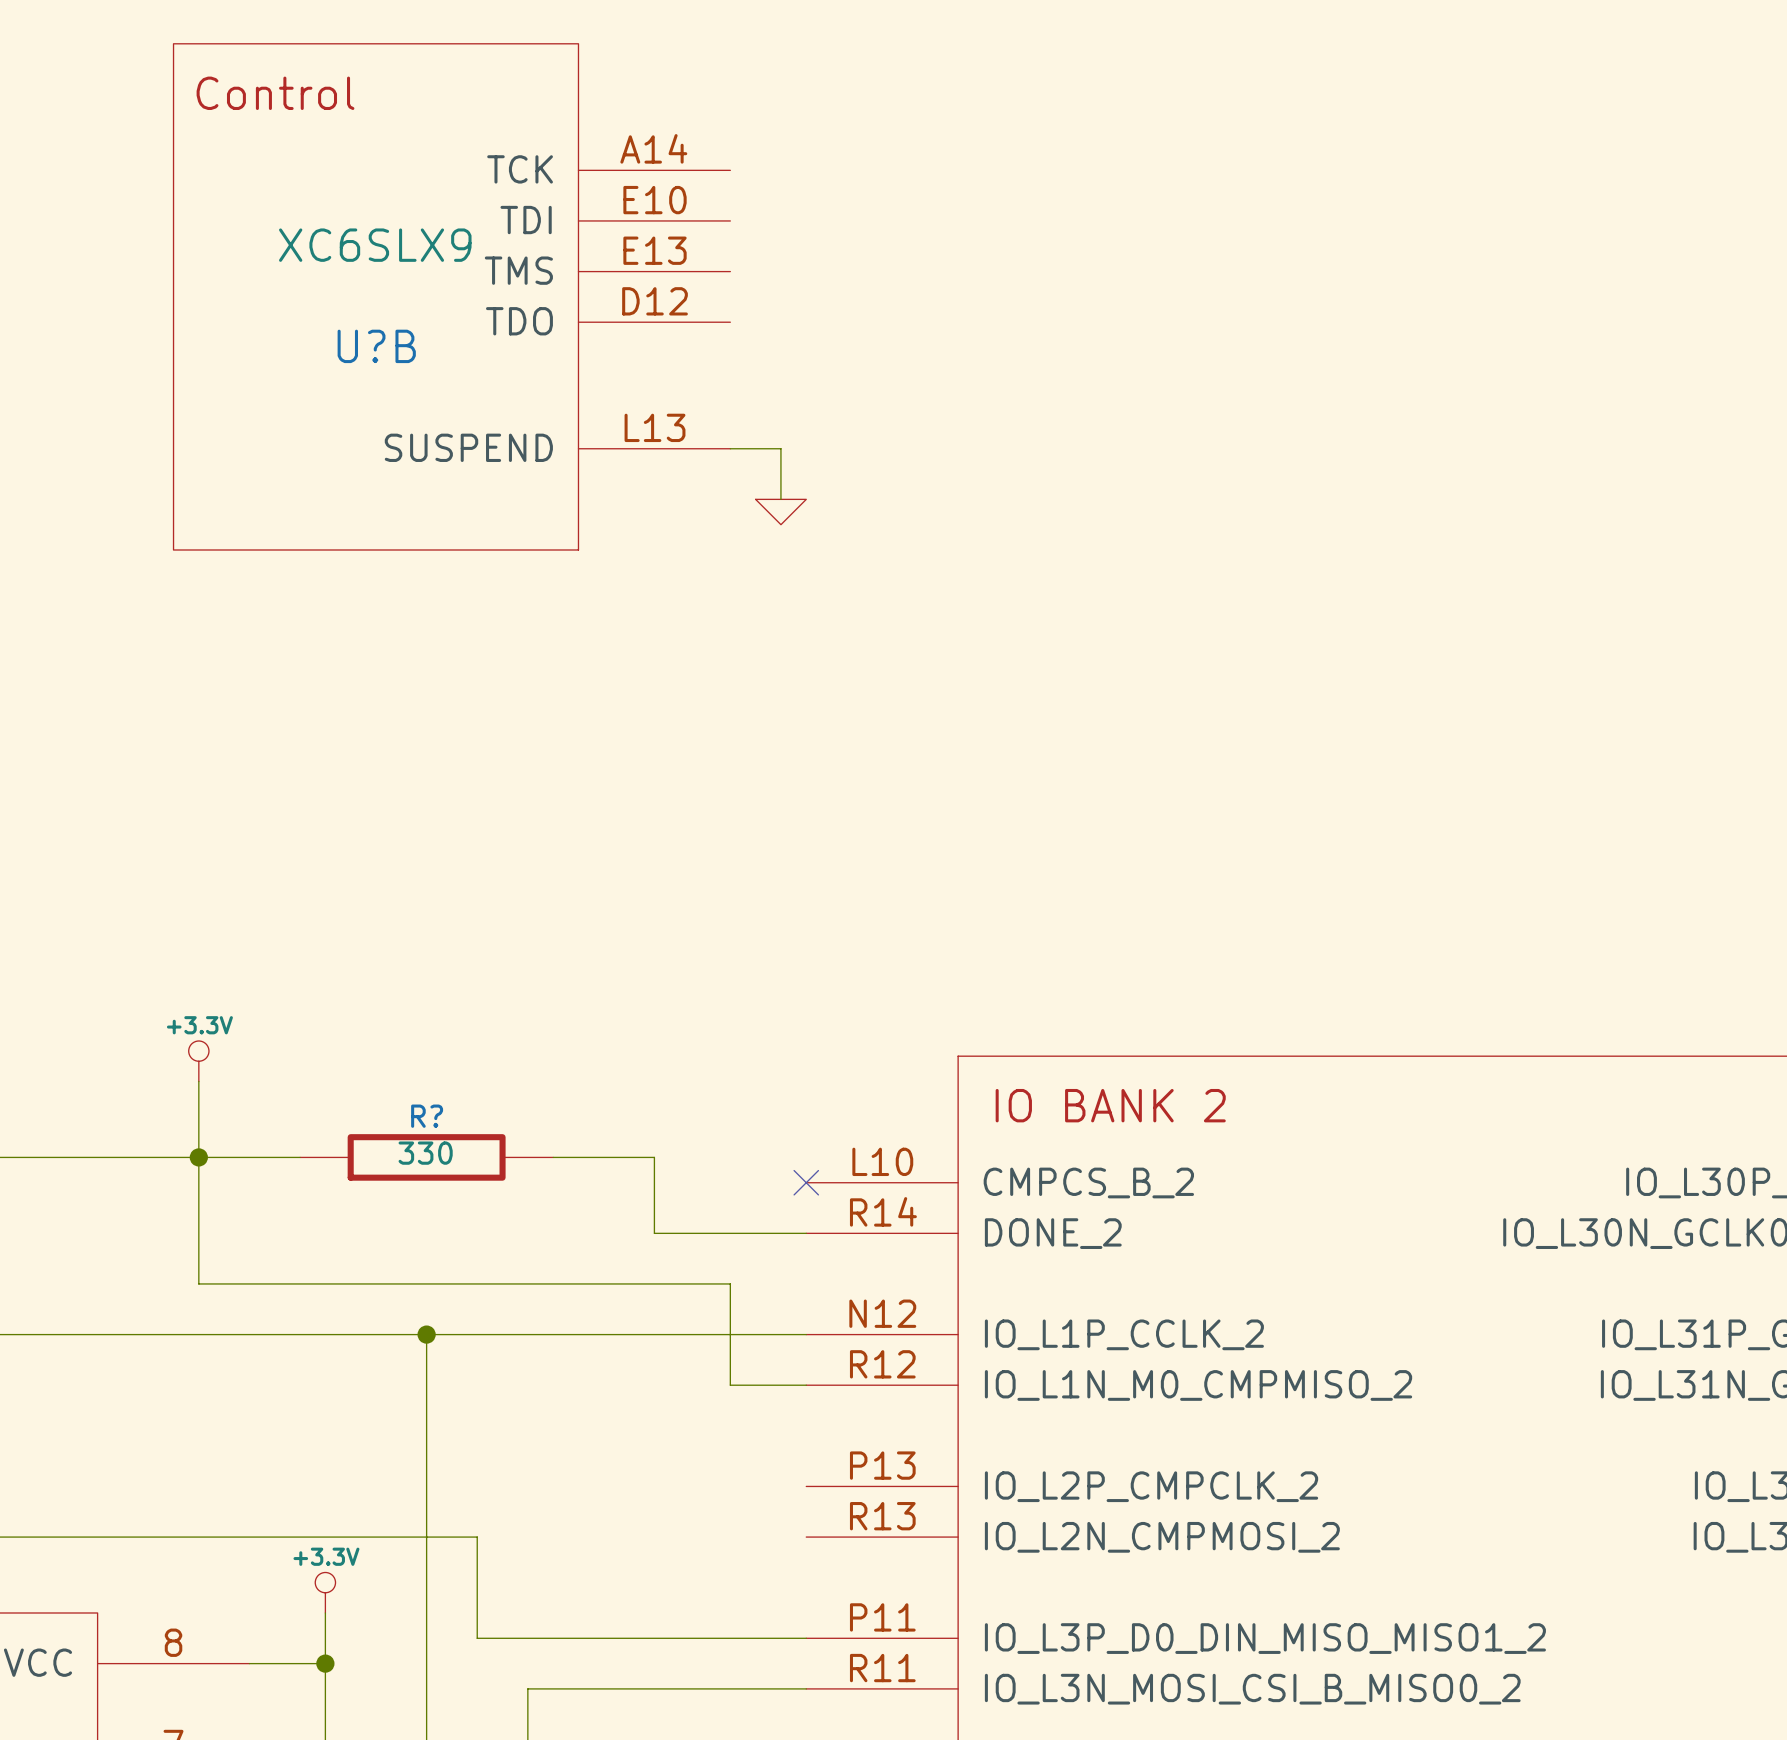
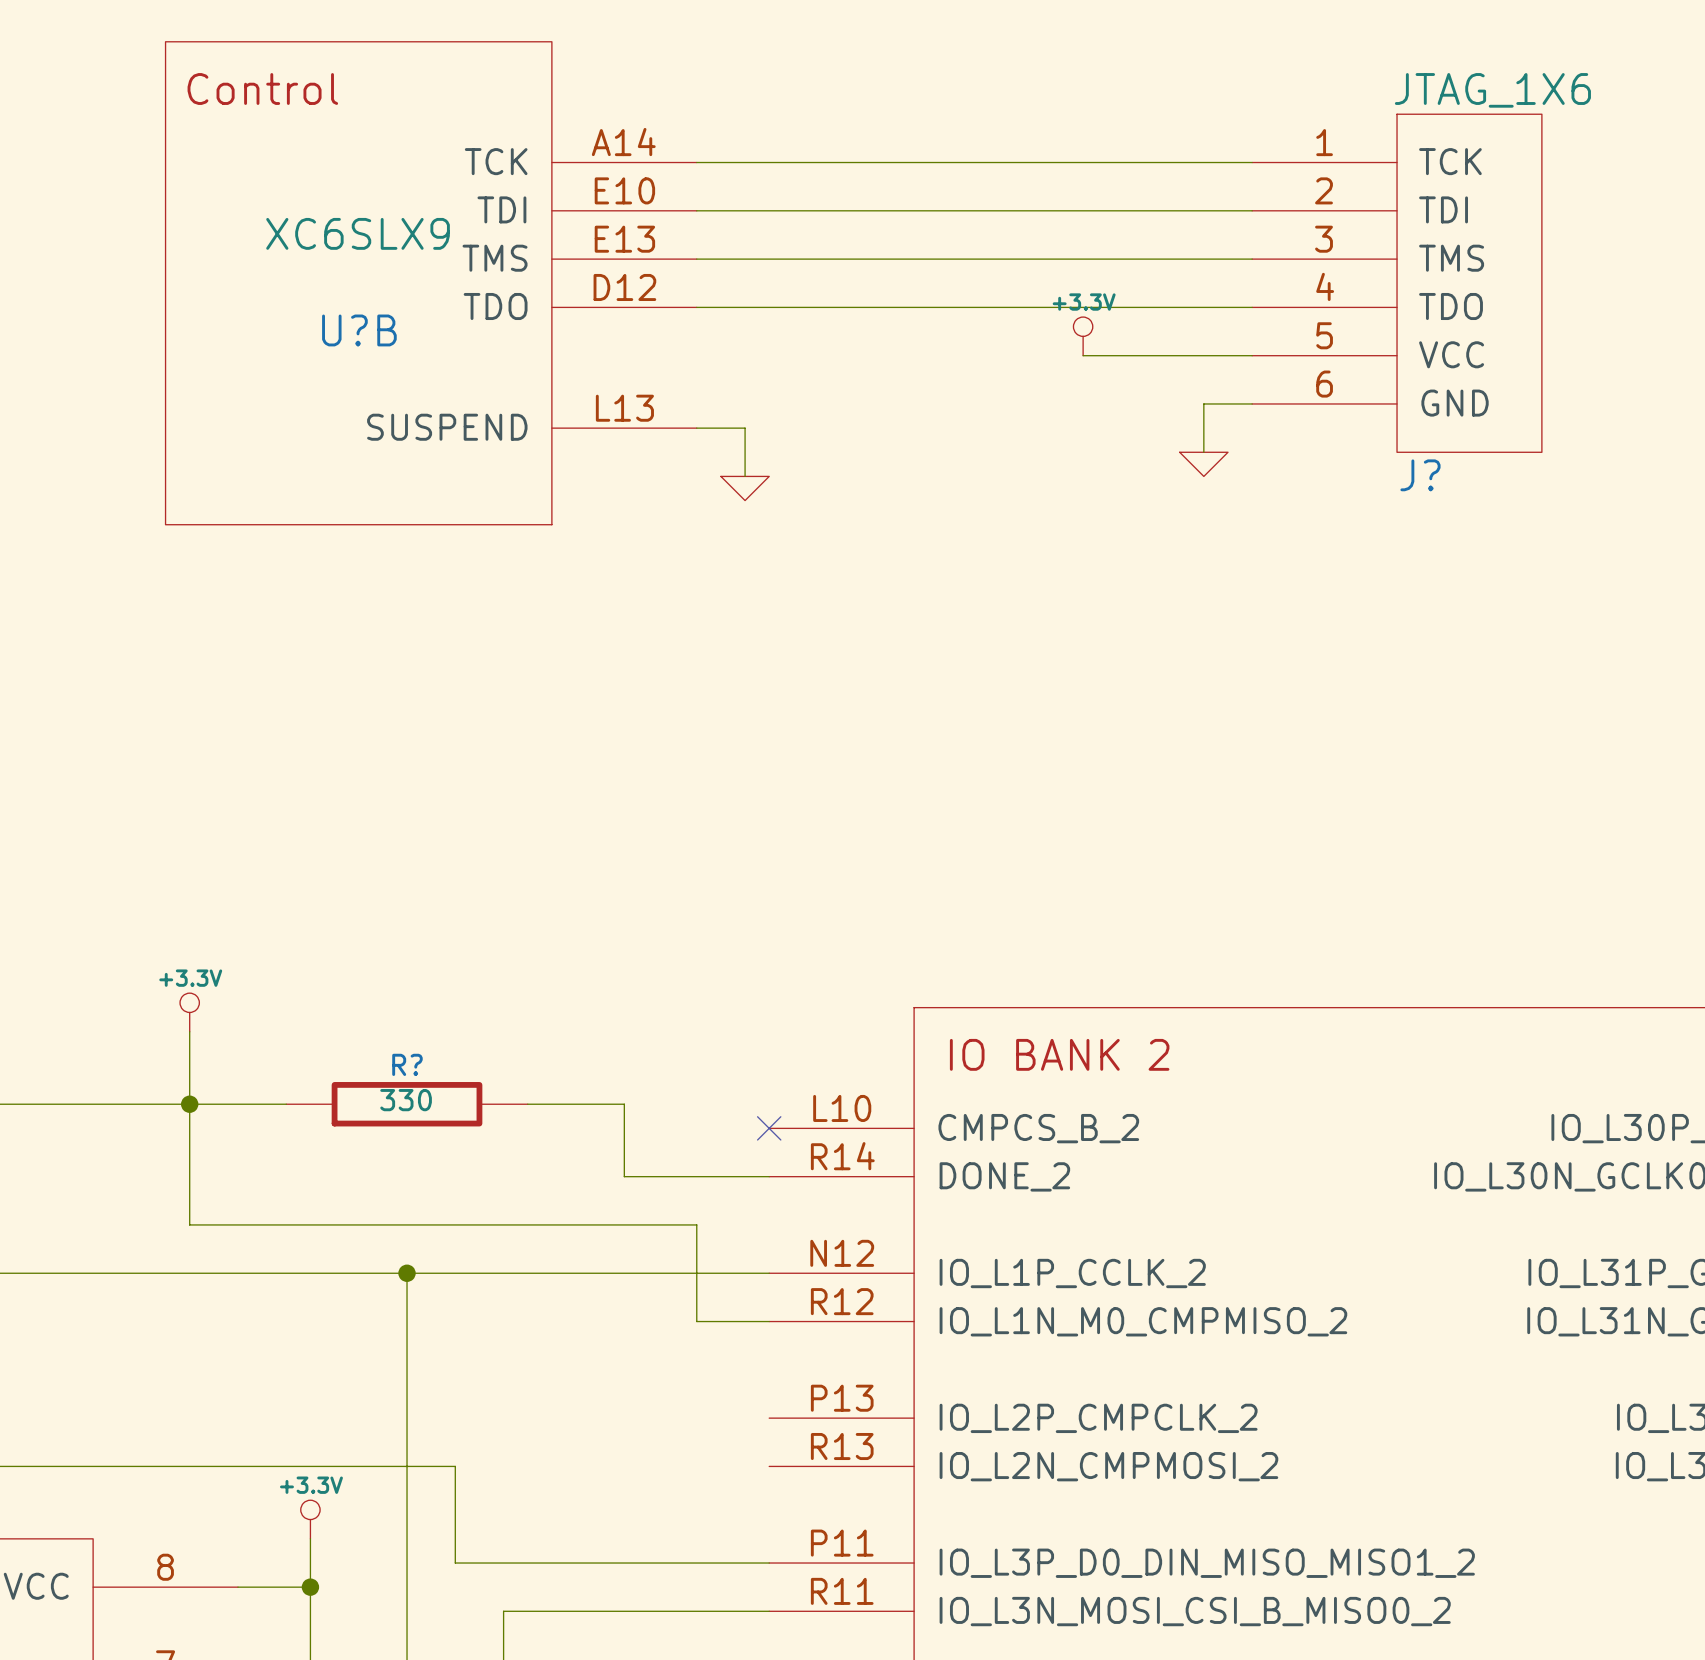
wire: none -> (696, 162) (1252, 162)
wire: none -> (696, 210) (1252, 210)
wire: none -> (696, 259) (1252, 259)
J?: none -> JTAG_1X6 (1397, 283)
wire: none -> (696, 307) (1252, 307)
power symbol: none -> +3.3V (1083, 336)
wire: none -> (1083, 355) (1252, 355)
wire: none -> (1252, 403) (1203, 403) (1203, 452)
power symbol: none -> (1203, 464)

